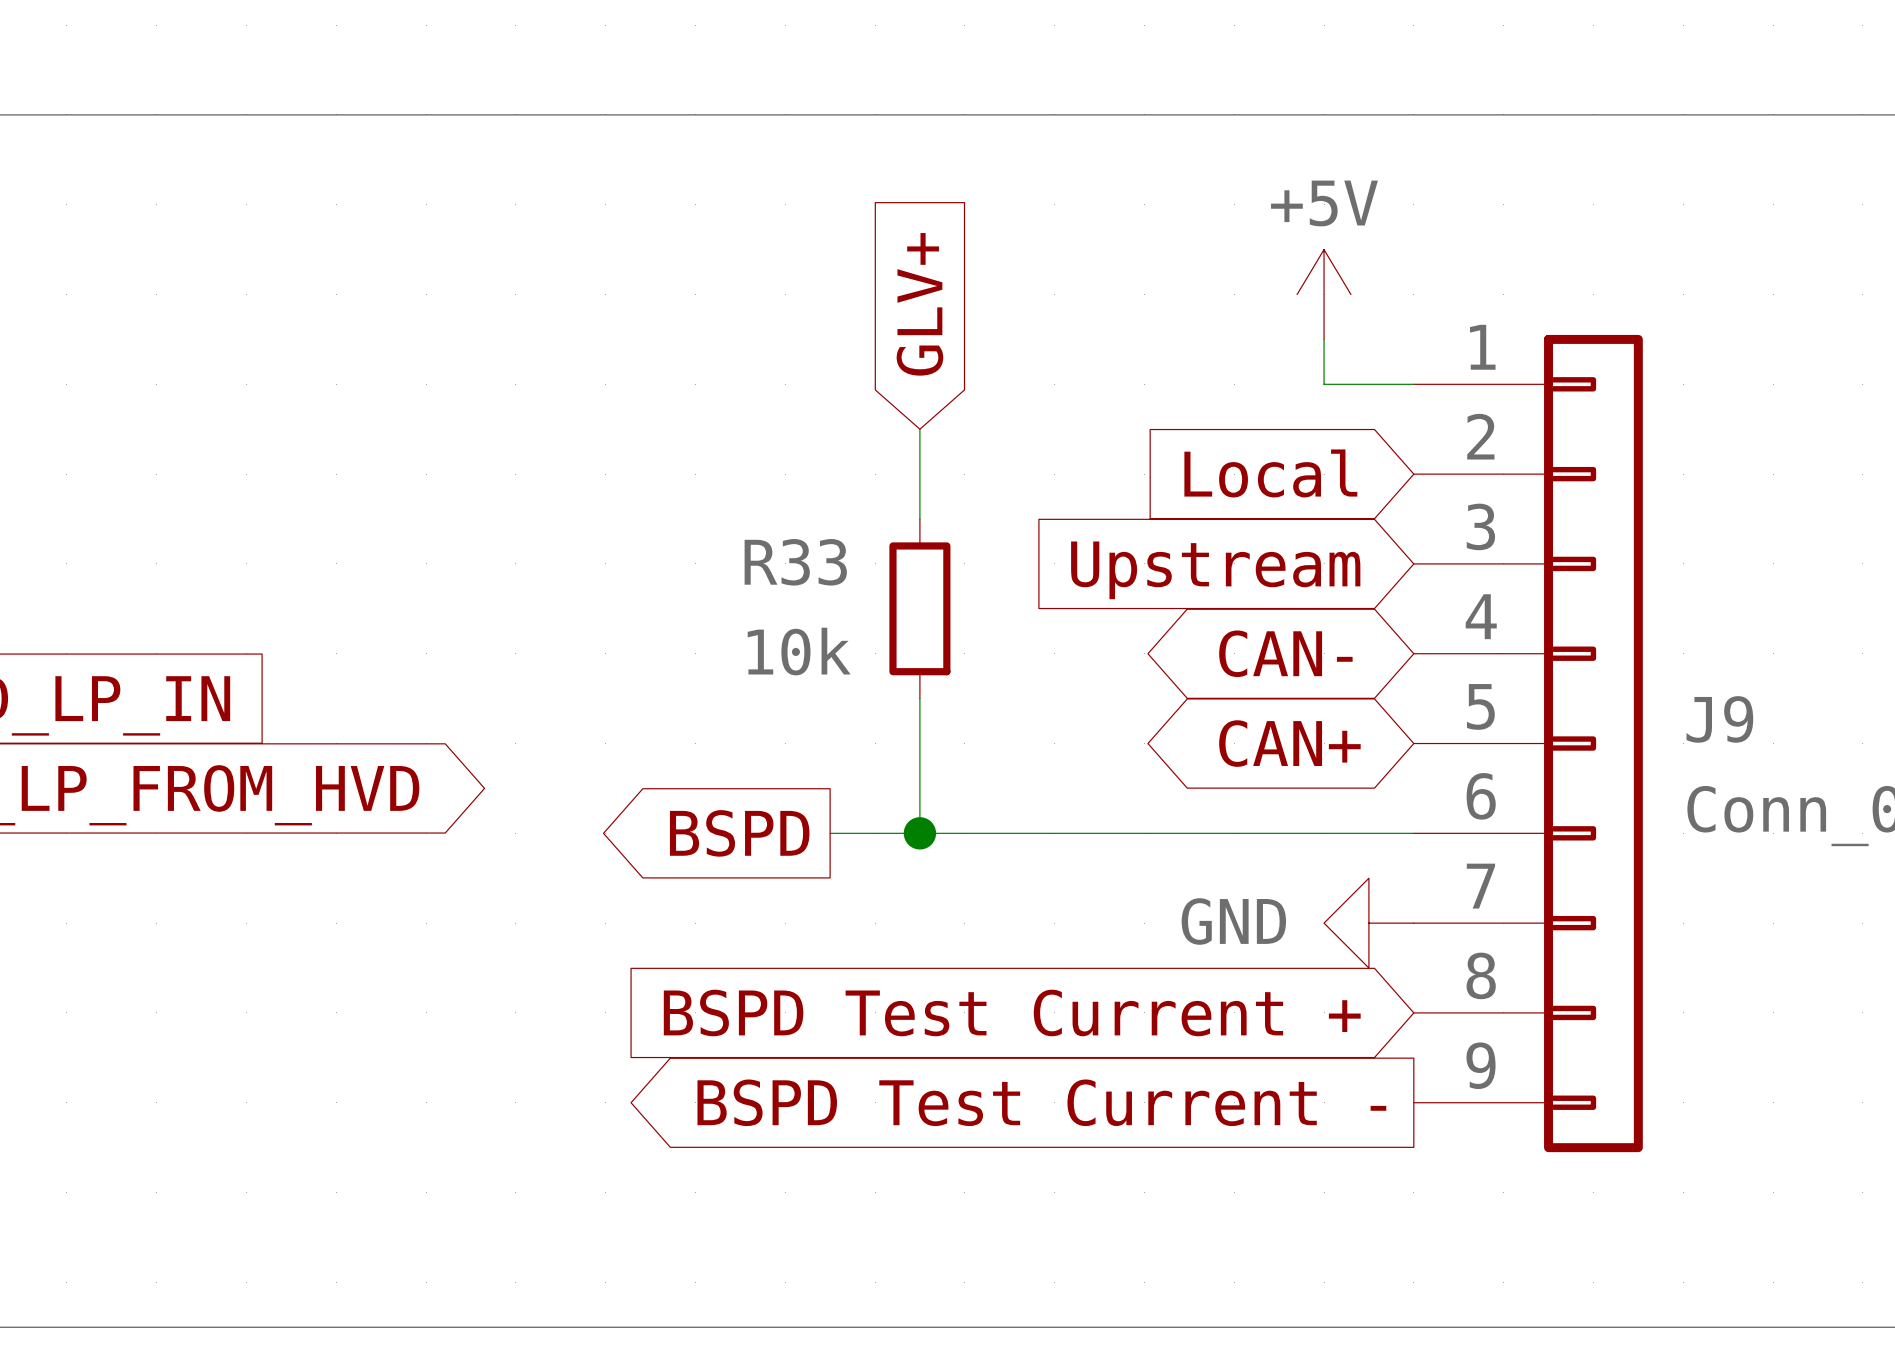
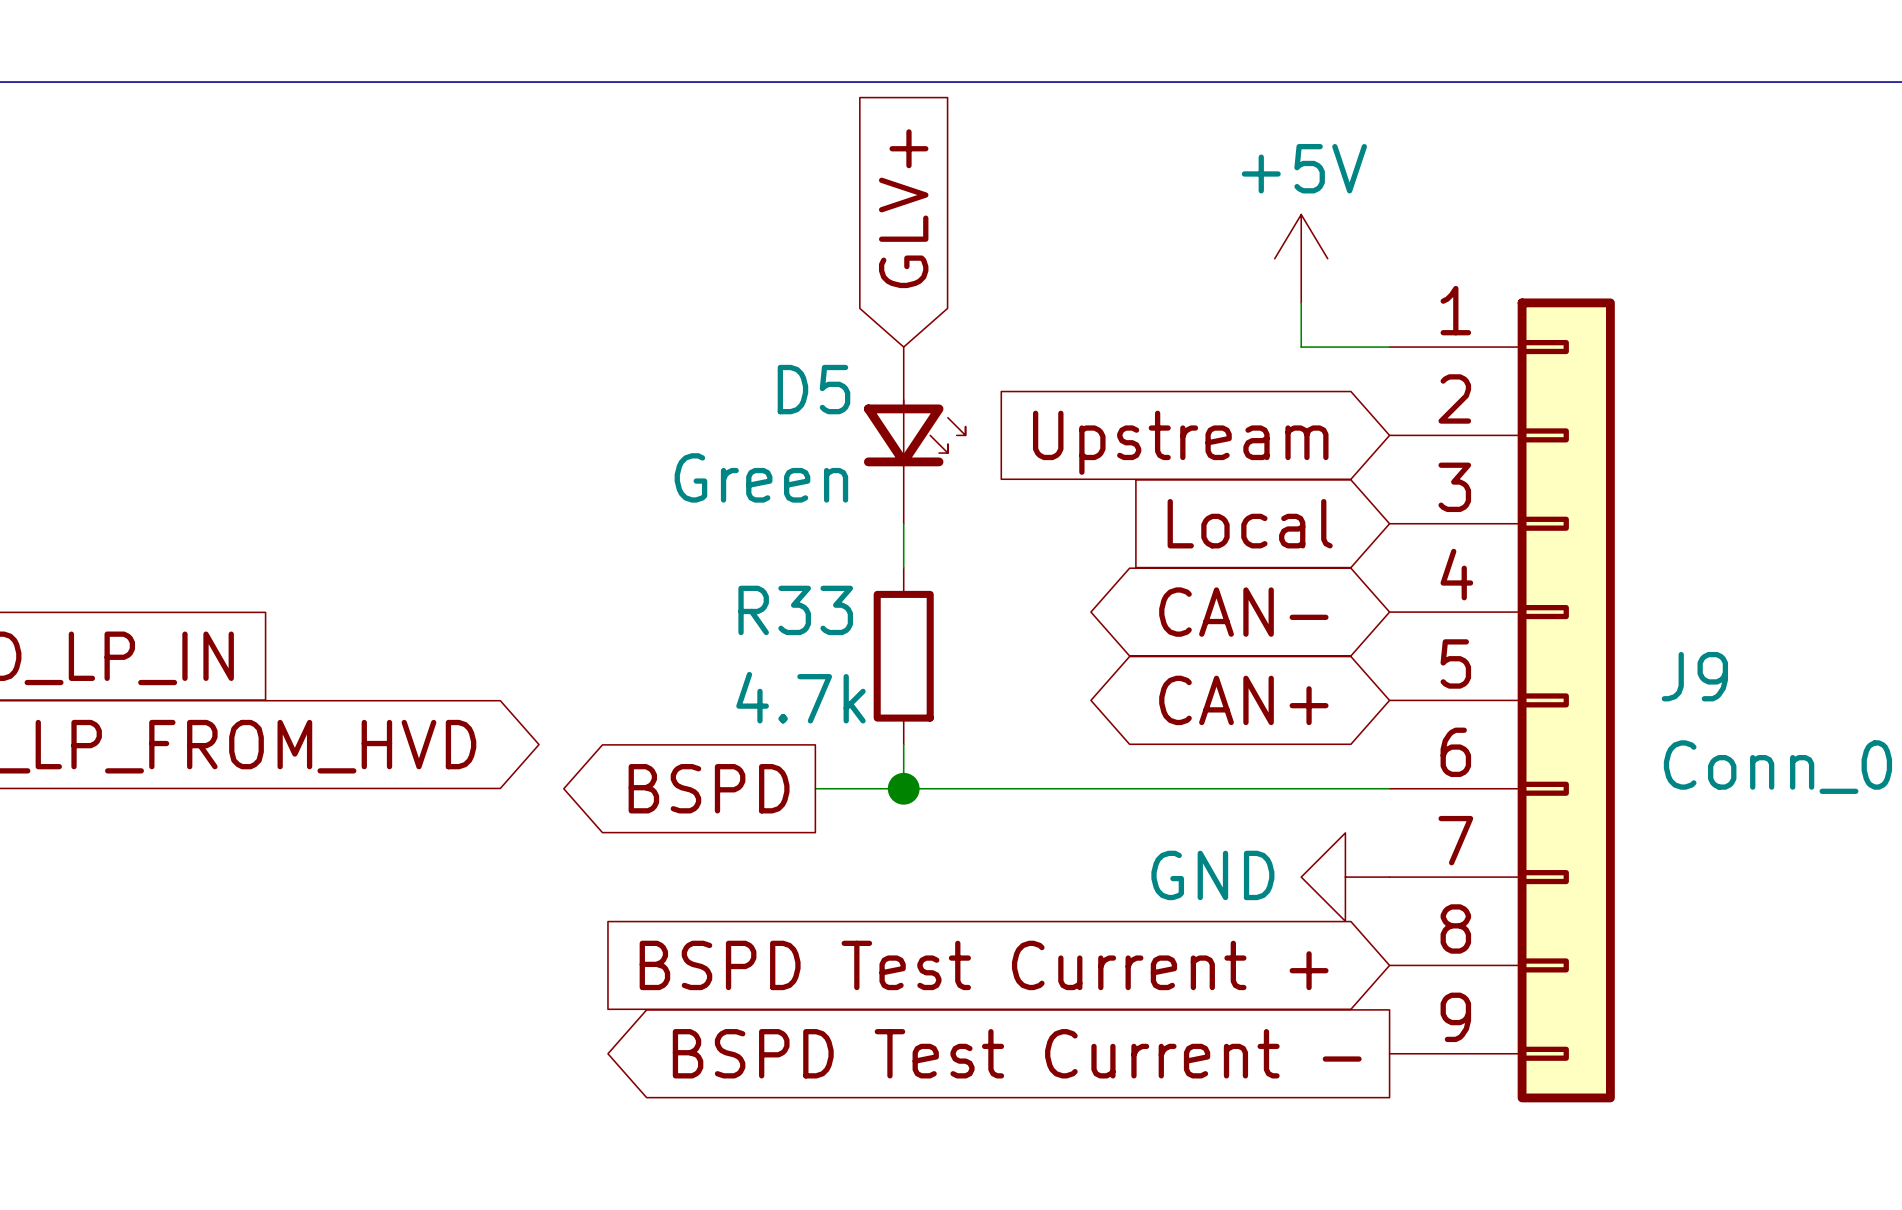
global label position: GLV+ (919, 304) -> GLV+ (903, 208)
global label: Local (1270, 473) -> Upstream (1180, 442)
D5: none -> Green (914, 435)
wire: none -> (903, 523) (903, 567)
global label: Upstream (1215, 570) -> Local (1250, 523)
R33 position: (919, 608) -> (903, 656)
R33 value: 10k (799, 651) -> 4.7k (800, 697)
wire: (919, 698) (919, 788) -> none

